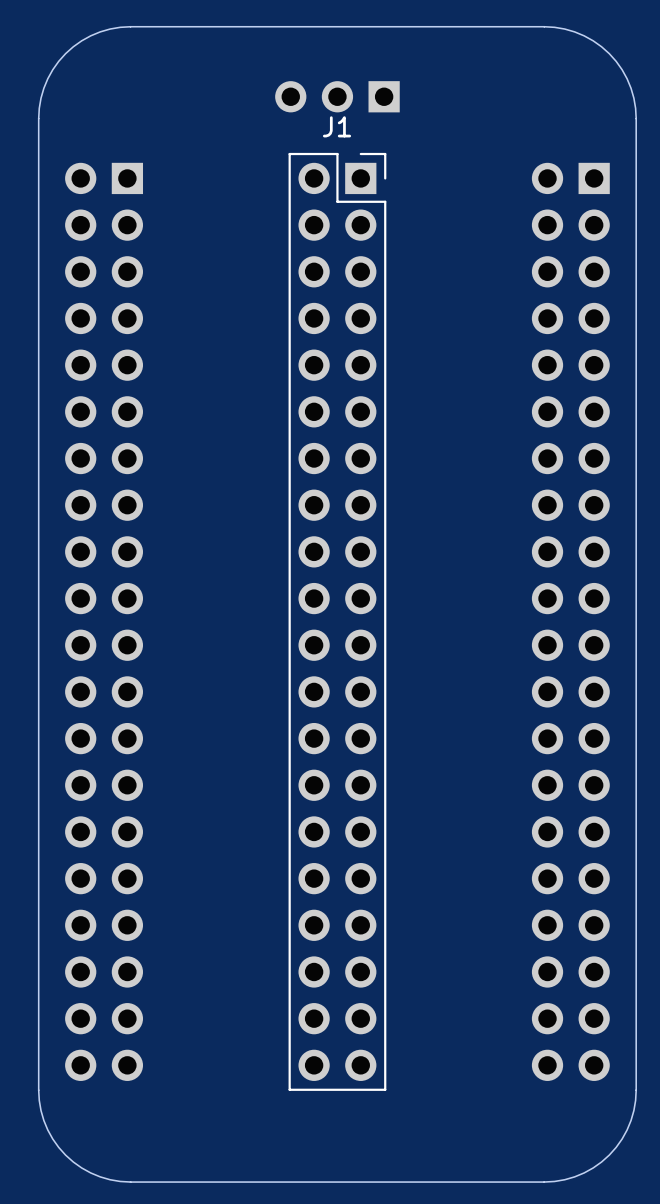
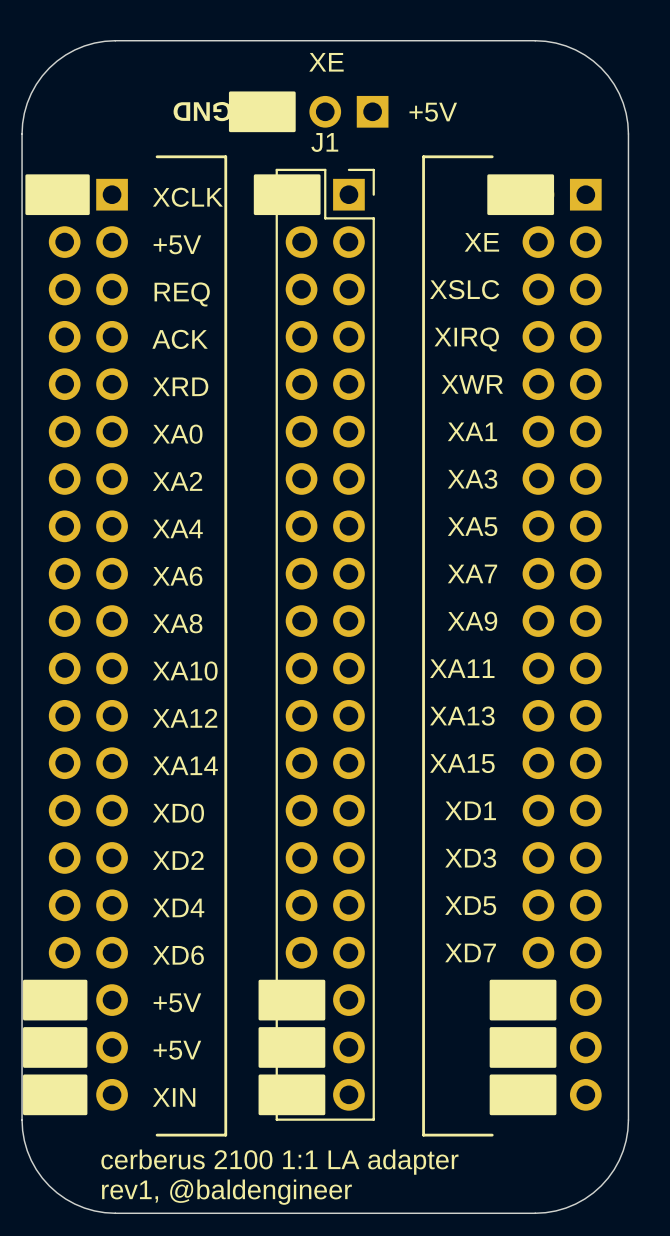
text: none -> XE (326, 62)
drawing: none -> [228, 91, 296, 133]
text: none -> GND (202, 111)
text: none -> +5V (433, 112)
line: none -> (157, 156) (225, 156) (225, 1135) (157, 1135)
line: none -> (492, 156) (423, 156) (423, 1135) (492, 1135)
drawing: none -> [25, 174, 90, 216]
drawing: none -> [253, 174, 321, 216]
drawing: none -> [487, 174, 555, 216]
text: none -> XCLK (187, 197)
text: none -> XE (481, 242)
text: none -> +5V (177, 244)
text: none -> XSLC (464, 289)
text: none -> REQ (182, 294)
text: none -> XIRQ (466, 339)
text: none -> ACK (180, 339)
text: none -> XWR (472, 384)
text: none -> XRD (180, 386)
text: none -> XA1 (472, 431)
text: none -> XA0 (177, 434)
text: none -> XA3 (472, 479)
text: none -> XA2 (177, 481)
text: none -> XA5 (472, 526)
text: none -> XA4 (177, 528)
text: none -> XA7 (472, 573)
text: none -> XA6 (177, 576)
text: none -> XA9 (472, 621)
text: none -> XA8 (177, 623)
text: none -> XA11 (462, 668)
text: none -> XA10 (185, 671)
text: none -> XA13 (462, 716)
text: none -> XA12 (185, 718)
text: none -> XA15 (462, 763)
text: none -> XA14 (185, 765)
text: none -> XD1 (470, 810)
text: none -> XD0 (178, 813)
text: none -> XD3 (470, 858)
text: none -> XD2 (178, 860)
text: none -> XD5 (470, 905)
text: none -> XD4 (178, 907)
text: none -> XD7 (470, 952)
text: none -> XD6 (178, 955)
drawing: none -> [23, 979, 88, 1116]
drawing: none -> [258, 979, 326, 1116]
drawing: none -> [489, 979, 557, 1116]
text: none -> +5V (177, 1002)
text: none -> +5V (177, 1050)
text: none -> XIN (174, 1097)
text: none -> cerberus 2100 1:1 LA adapter (279, 1162)
text: none -> rev1, @baldengineer (226, 1192)

